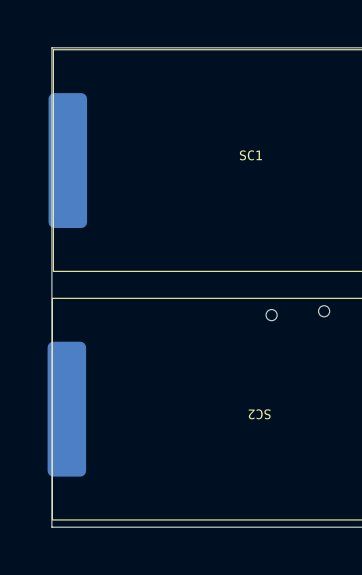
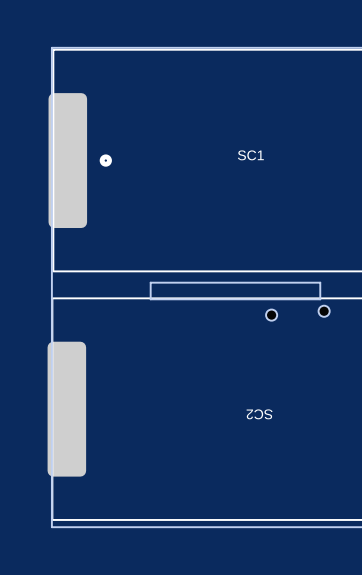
part: none -> (105, 160)
board edge: none -> (320, 282) (150, 282) (150, 299) (320, 299) (320, 282)

